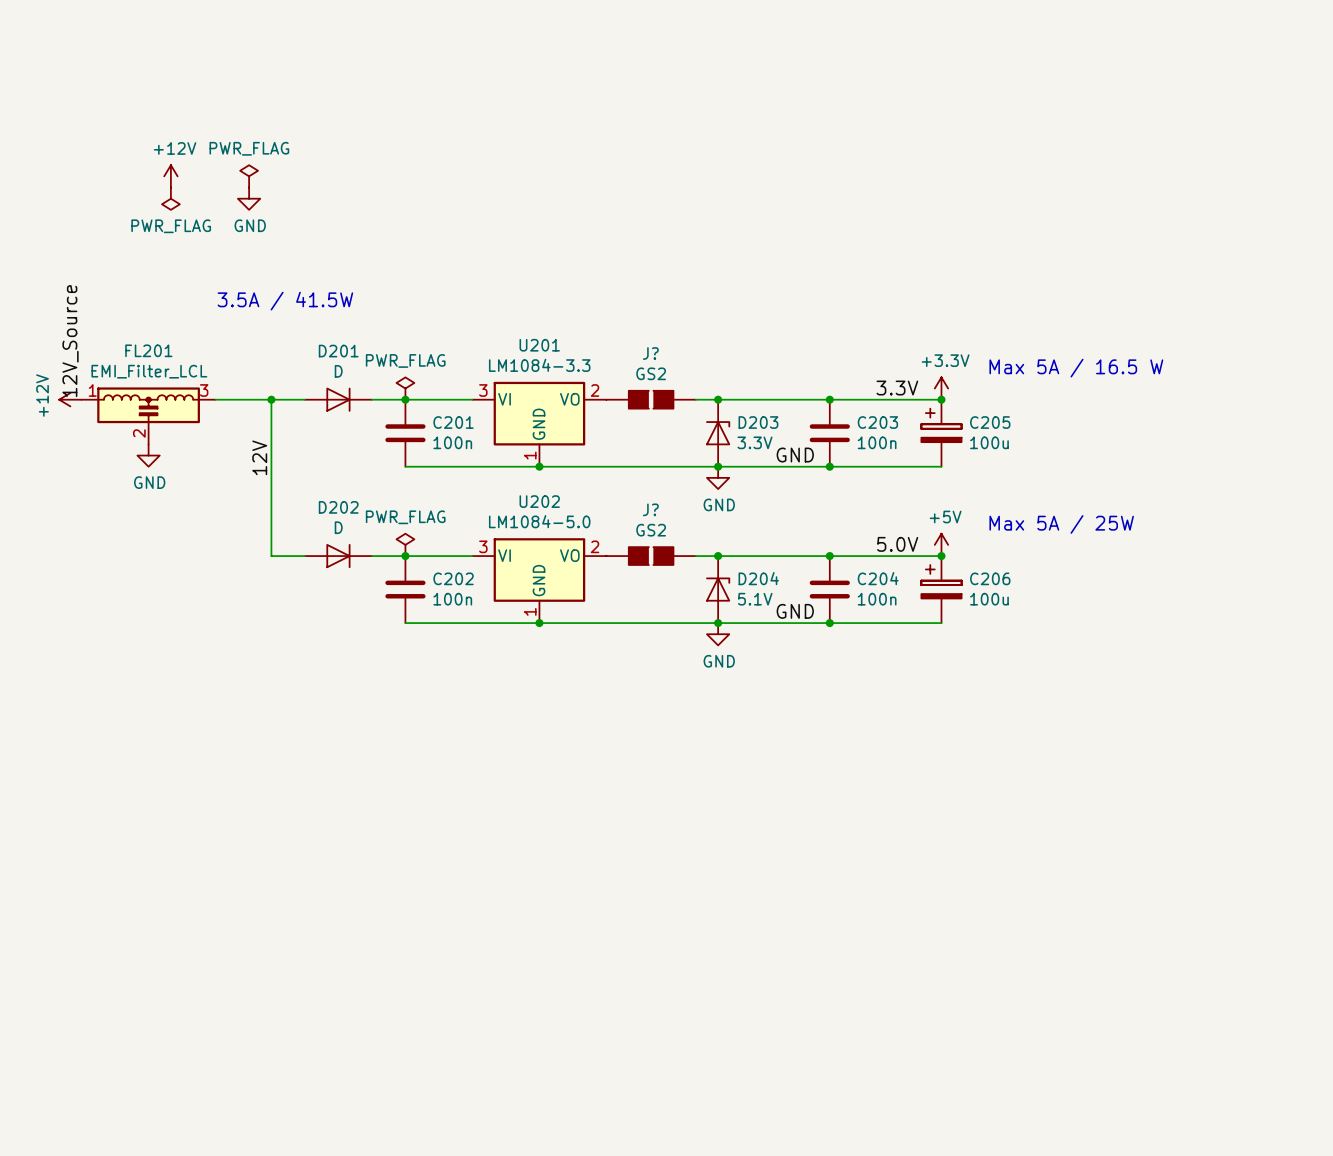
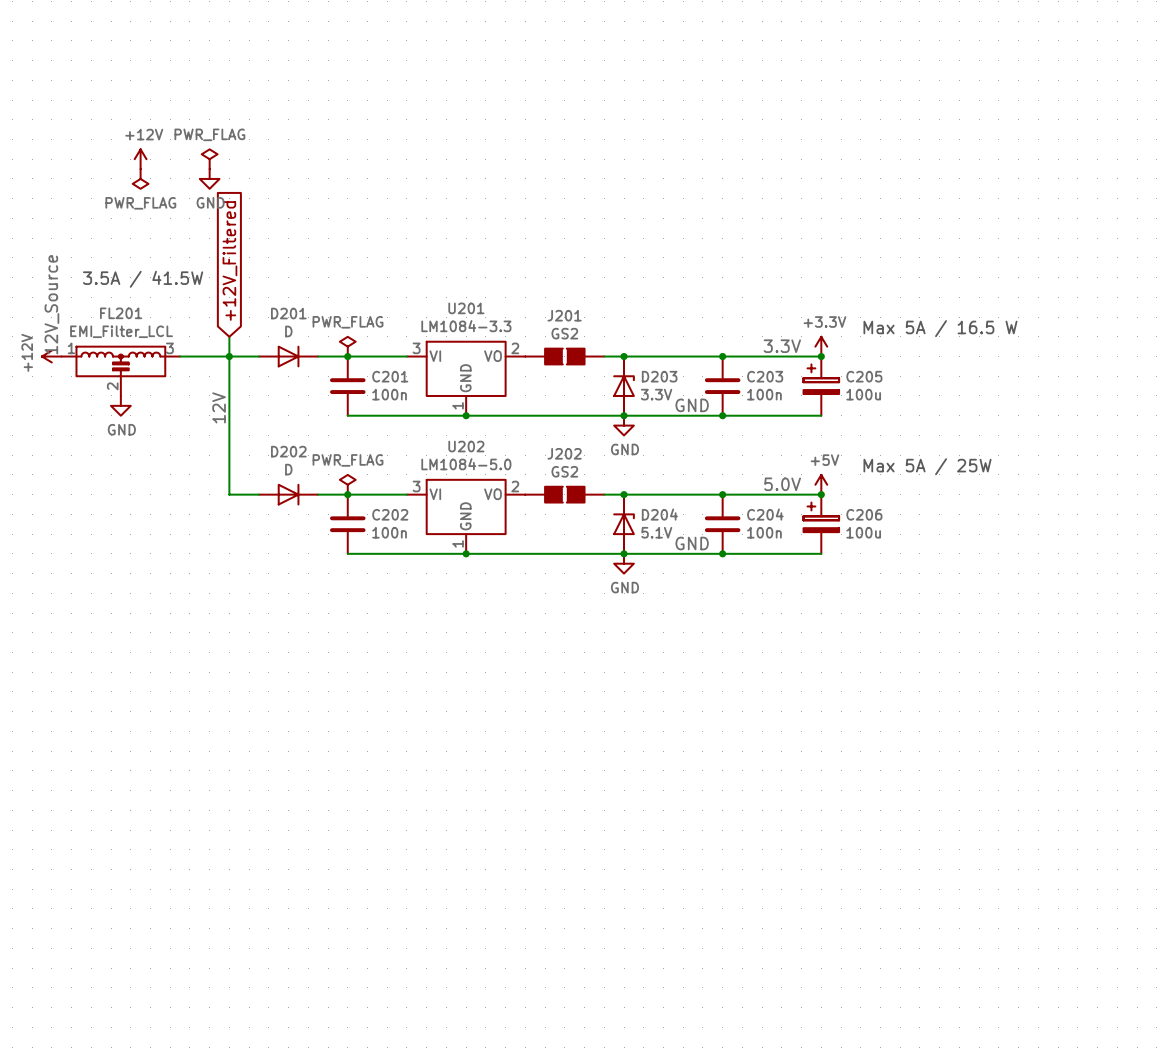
global label: none -> +12V_Filtered (229, 260)
text position: 3.5A / 41.5W (285, 301) -> 3.5A / 41.5W (143, 279)
J? name: J? (650, 353) -> J201 (564, 315)
wire: none -> (229, 336) (229, 356)
J? name: J? (650, 509) -> J202 (564, 453)

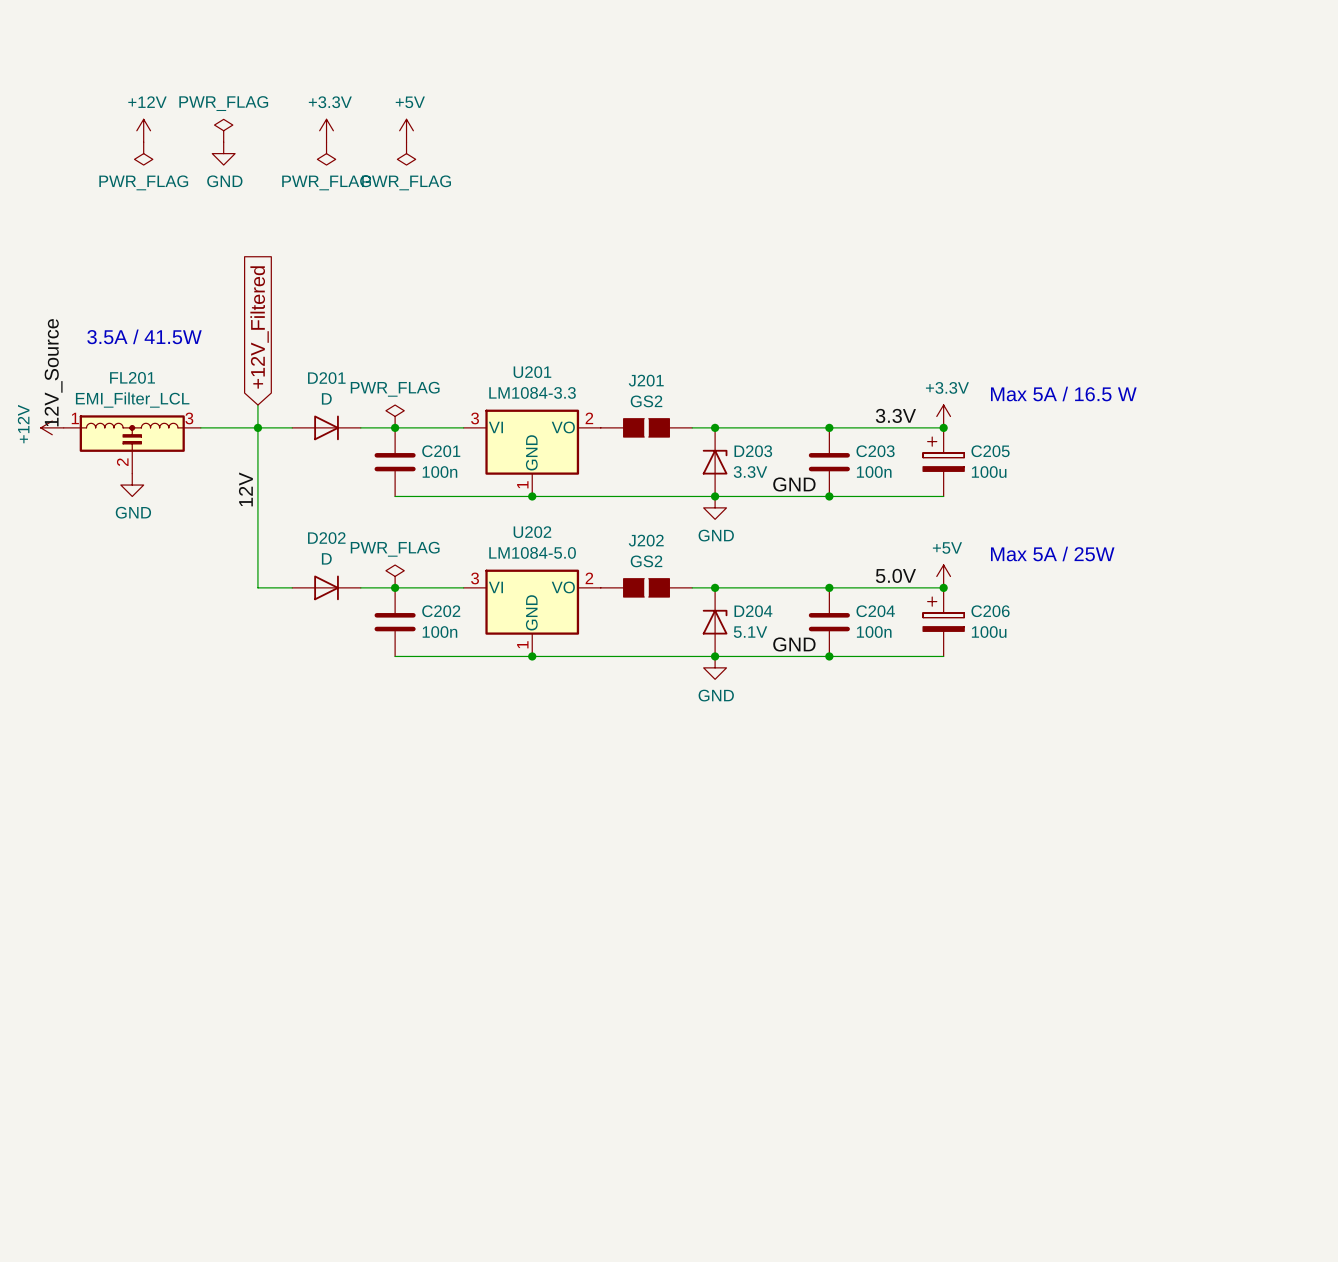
power symbol: none -> PWR_FLAG (223, 130)
power symbol: none -> +3.3V (326, 130)
power symbol: none -> +5V (406, 130)
power symbol: none -> PWR_FLAG (143, 153)
power symbol: none -> PWR_FLAG (326, 153)
power symbol: none -> PWR_FLAG (406, 153)
power symbol position: +12V (140, 159) -> +12V (143, 130)
power symbol: PWR_FLAG (209, 159) -> none
power symbol: PWR_FLAG (140, 178) -> none
power symbol position: GND (209, 178) -> GND (223, 153)

